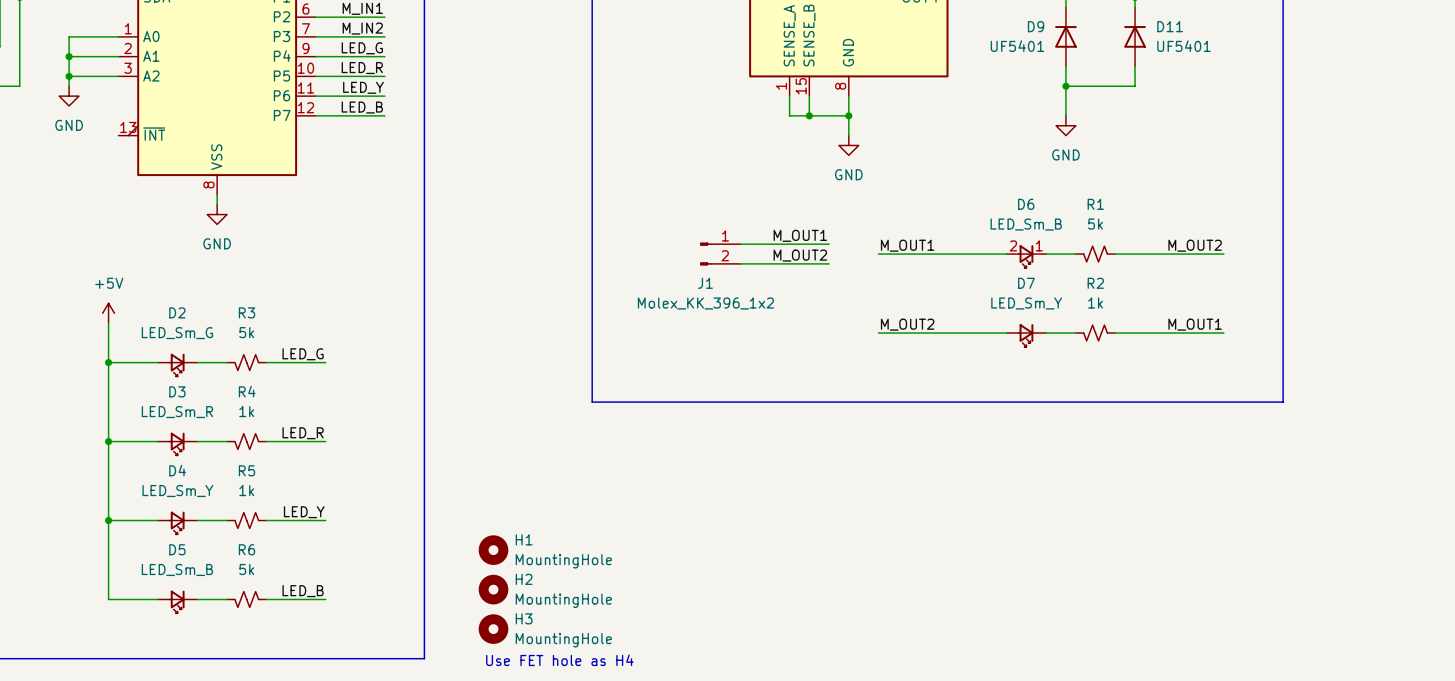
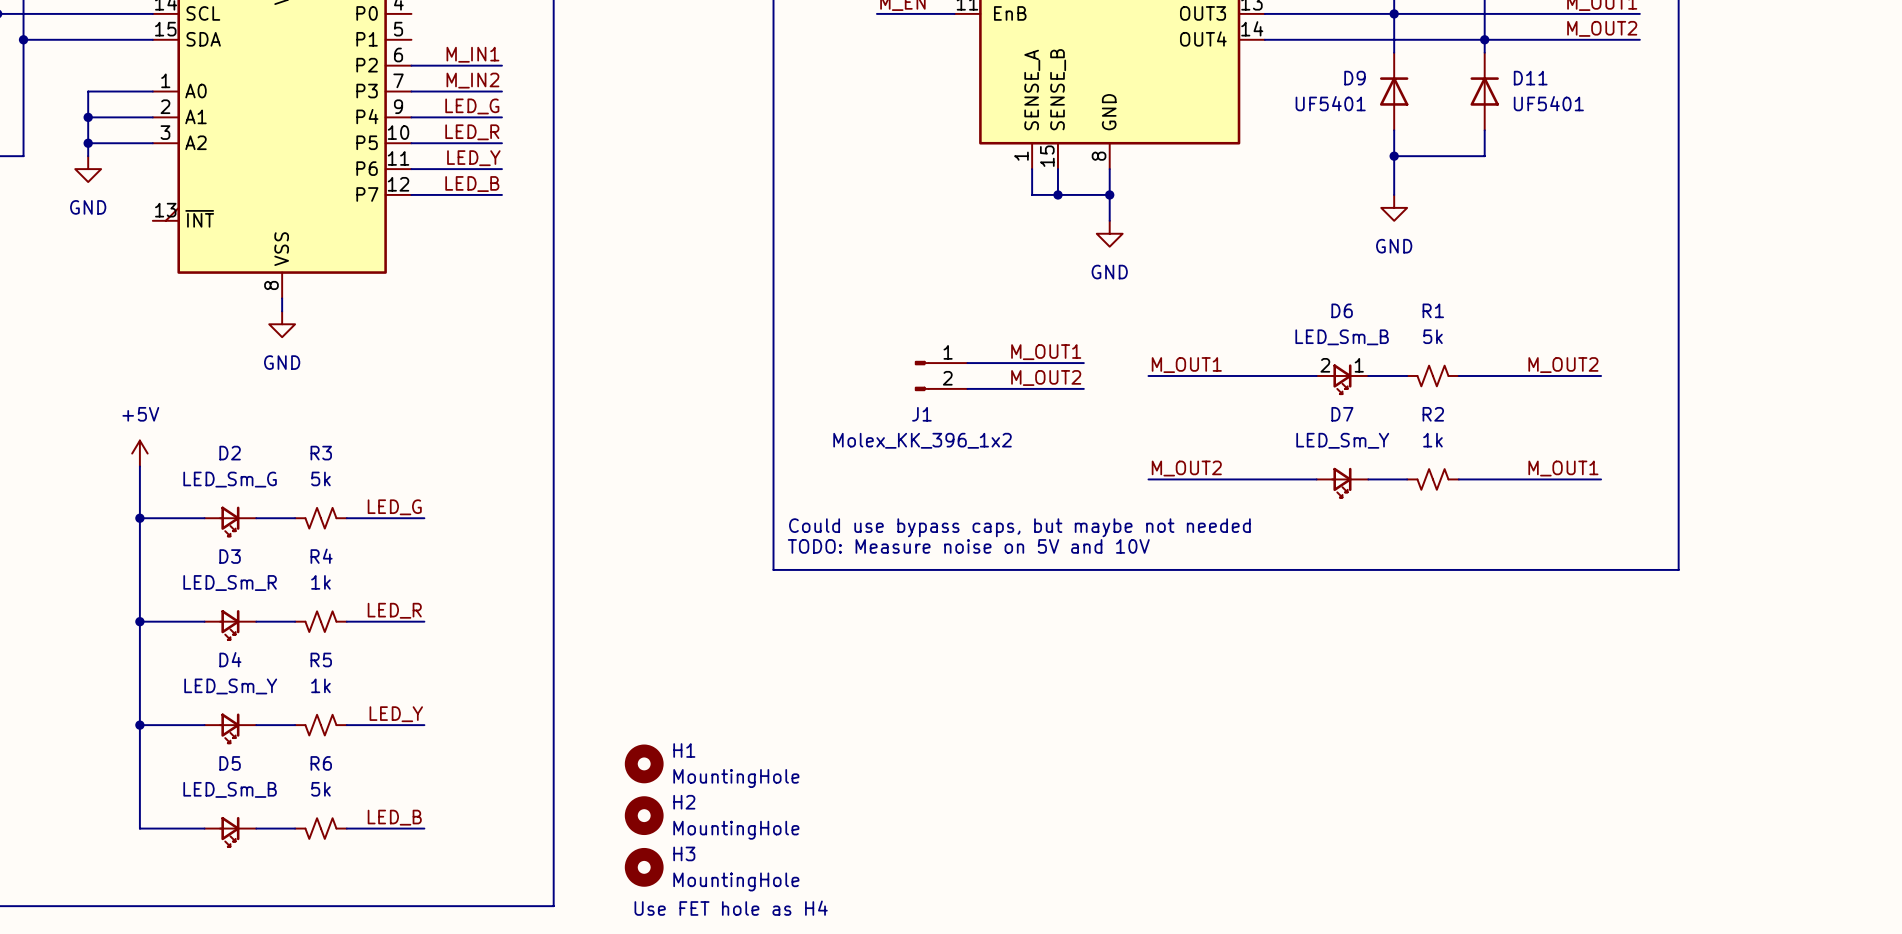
text: none -> Could use bypass caps, but maybe not needed (1019, 527)
text: none -> TODO: Measure noise on 5V and 10V (968, 546)

